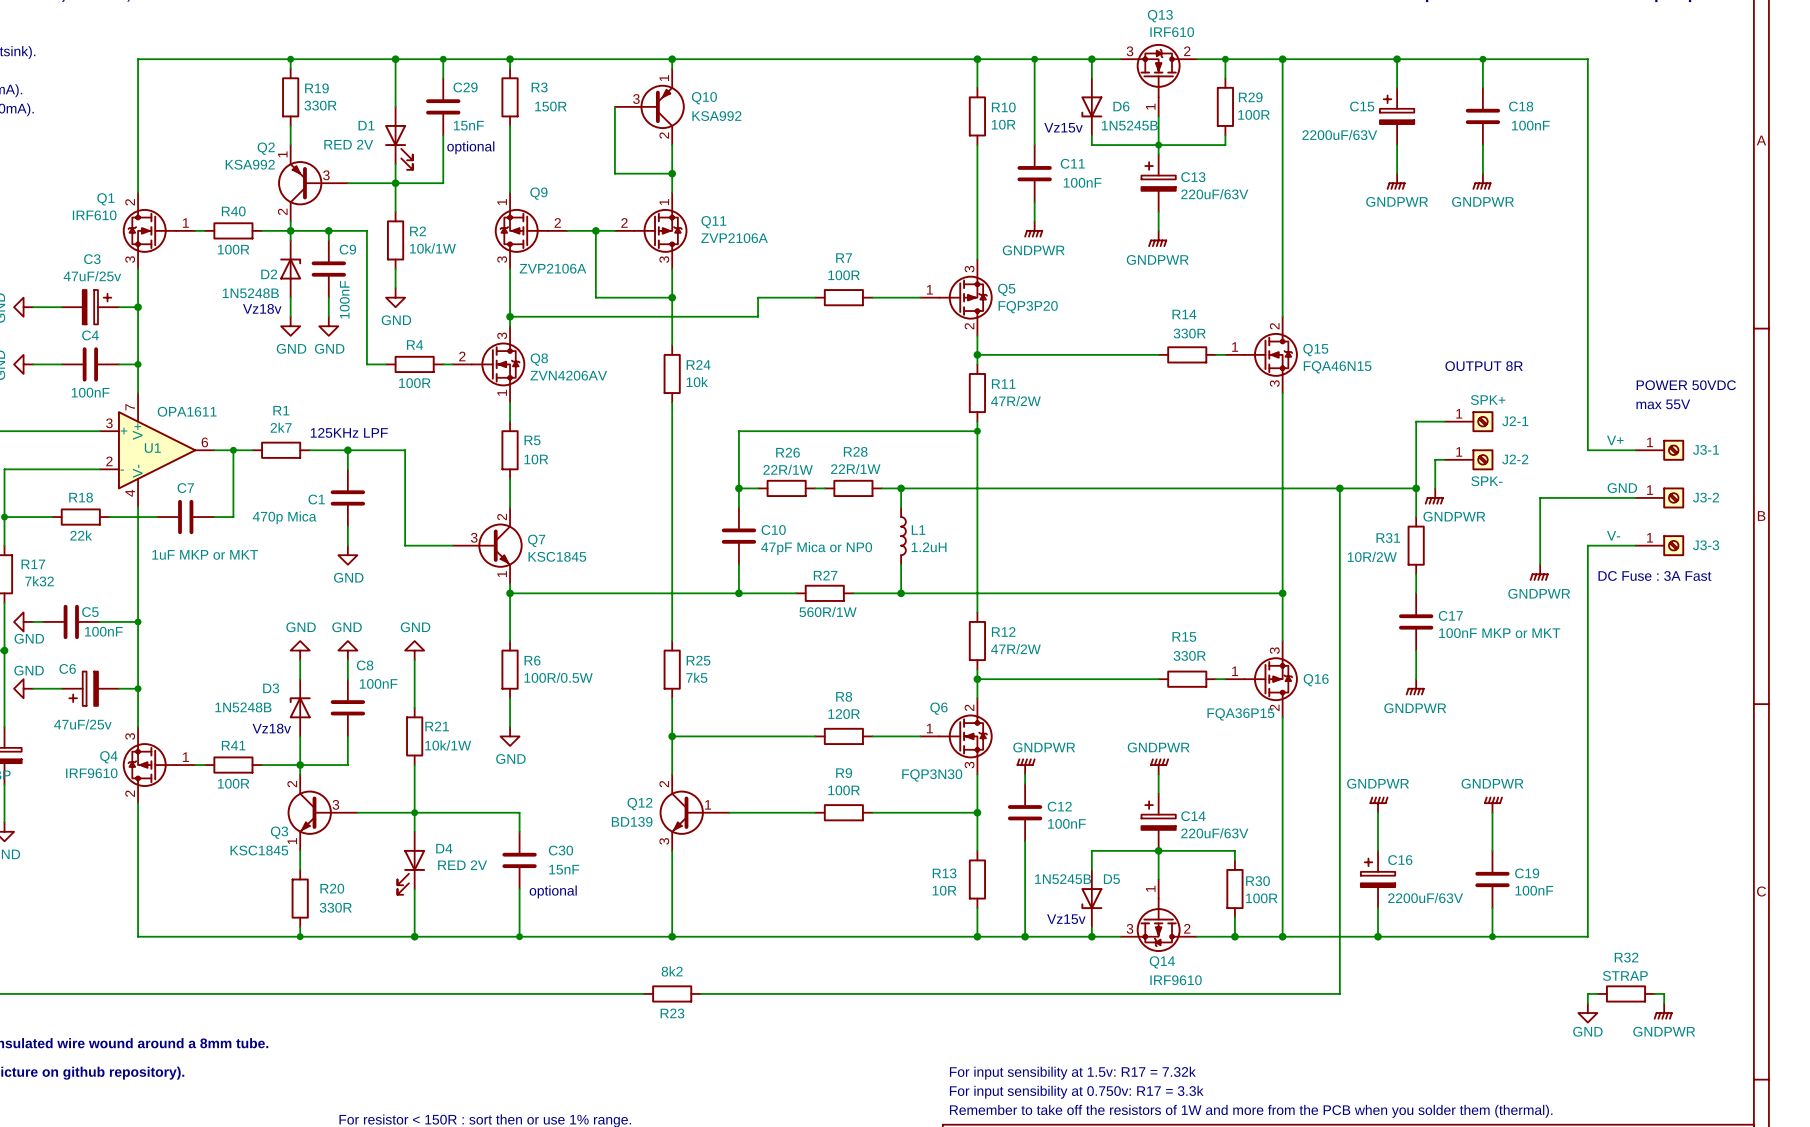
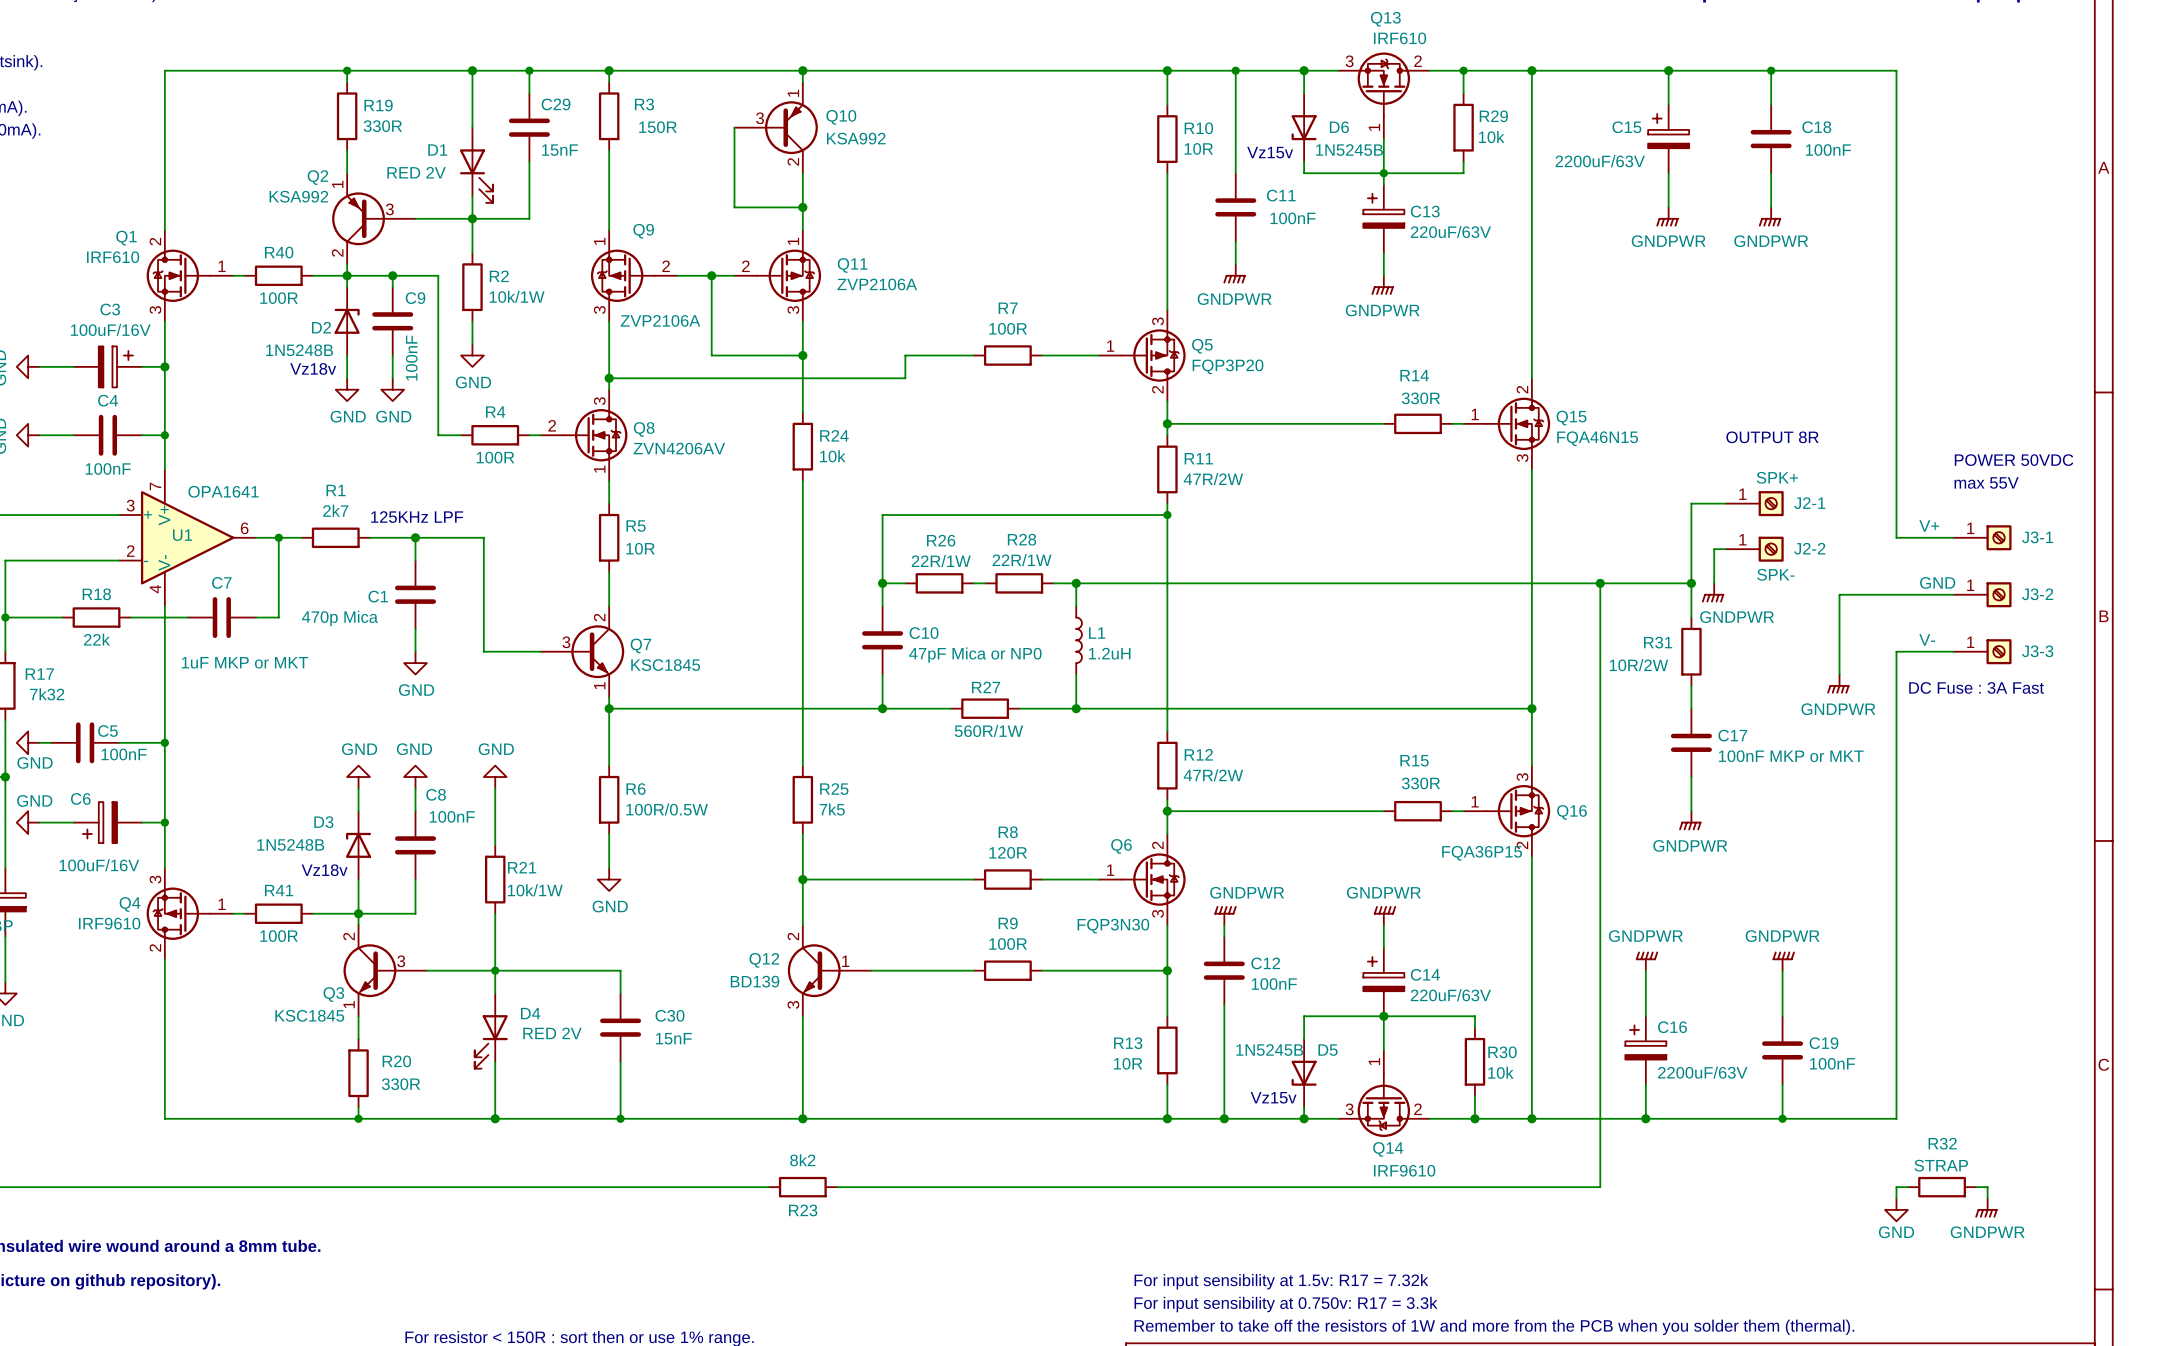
R29 value: 100R (1253, 114) -> 10k (1491, 137)
text: optional (470, 147) -> none
C3 value: 47uF/25v (92, 276) -> 100uF/16V (110, 329)
U1 value: OPA1611 (187, 411) -> OPA1641 (223, 491)
C6 value: 47uF/25v (82, 724) -> 100uF/16V (99, 865)
text: optional (553, 891) -> none
R30 value: 100R (1261, 898) -> 10k (1500, 1072)

